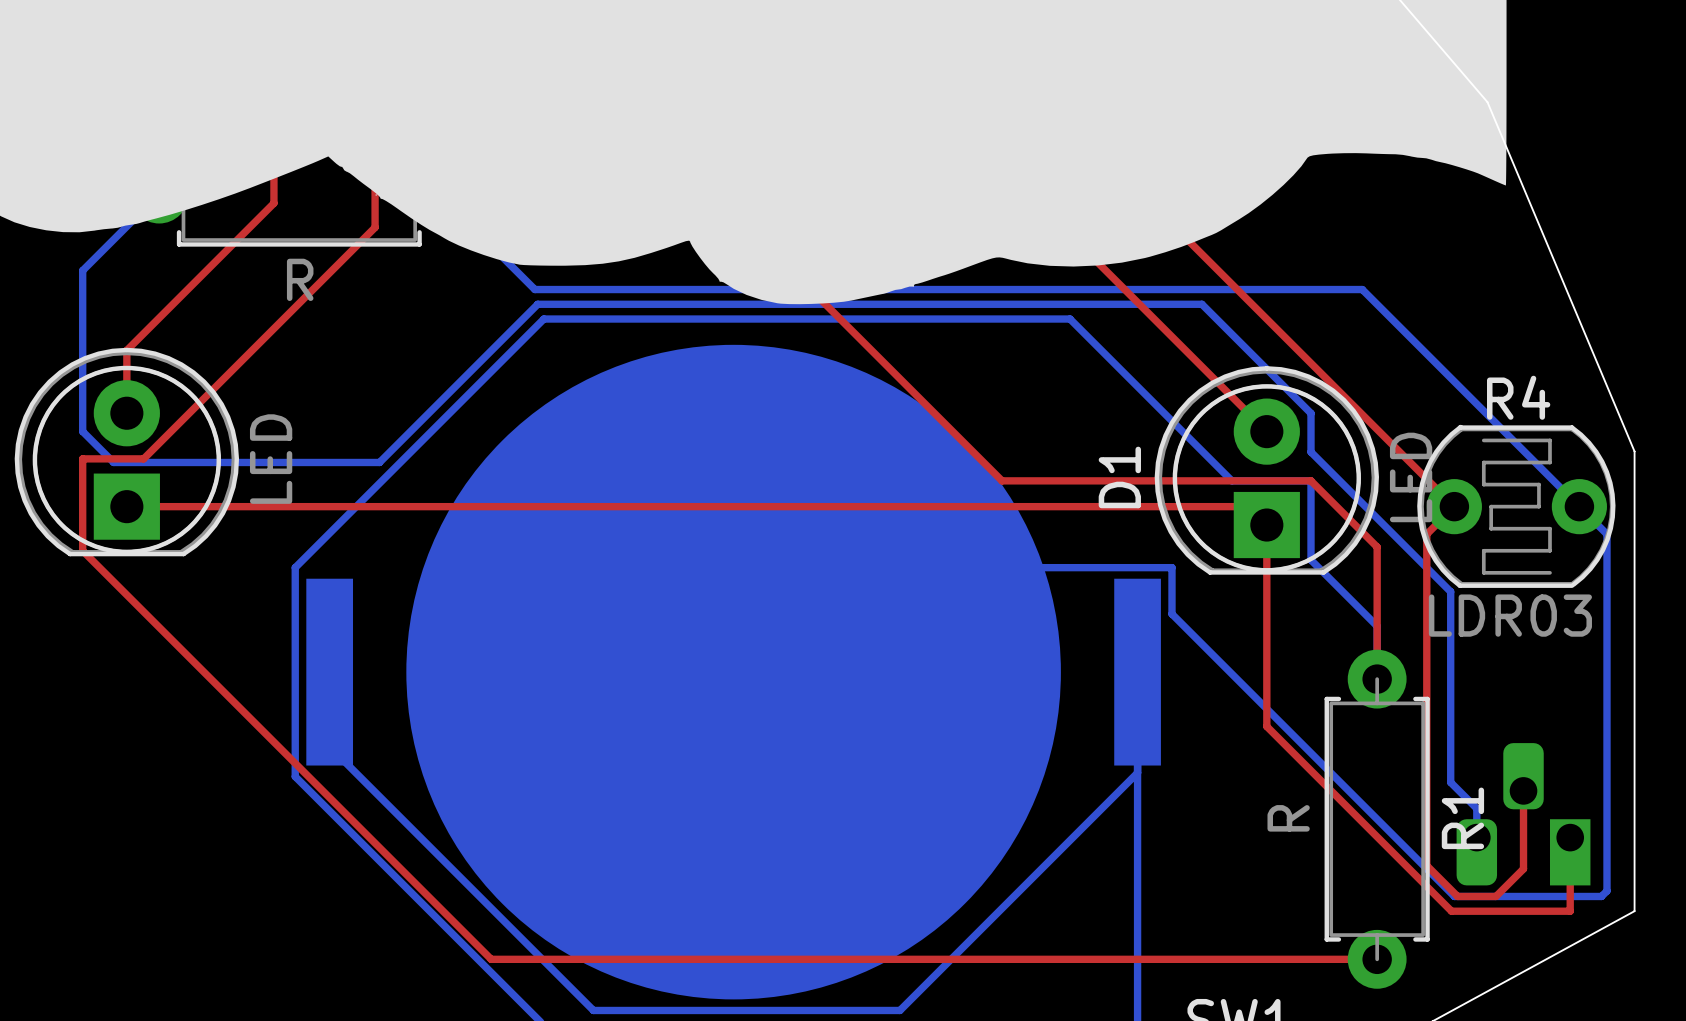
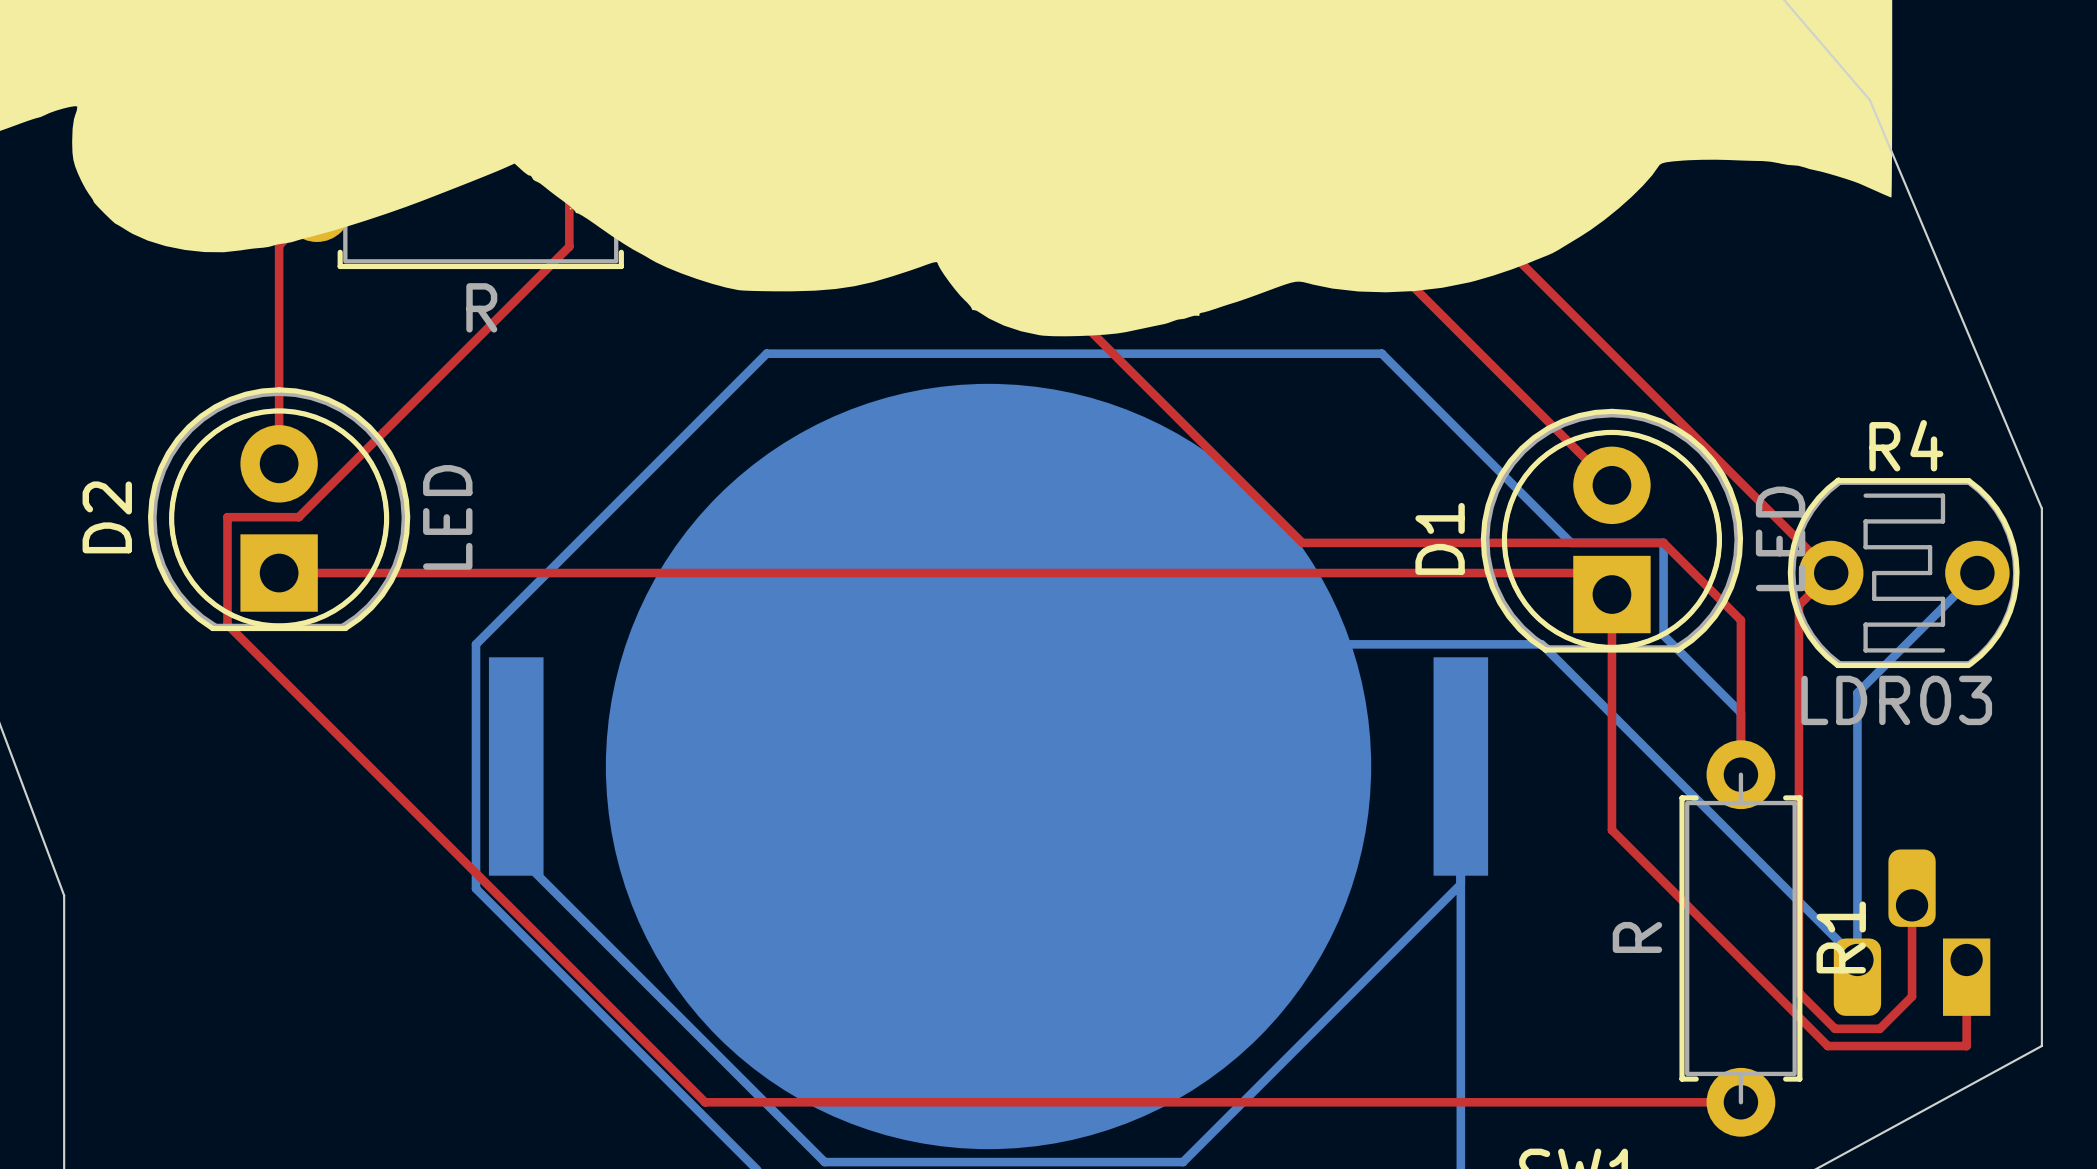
top track: (329, 37) (310, 56) (273, 56) (273, 203) (126, 350) -> (316, 207) (279, 245) (279, 390)
bottom track: (159, 194) (82, 270) (82, 431) (113, 462) (379, 462) (537, 304) (1201, 304) (1311, 413) (1311, 452) (1450, 591) (1450, 782) (1476, 808) -> (1977, 573) (1857, 692) (1857, 926)
bottom track: (439, 194) (534, 289) (1362, 289) (1606, 534) (1606, 891) (1601, 896) (1454, 896) (1171, 614) (1171, 567) -> (1857, 959) (1541, 644) (1501, 644)

